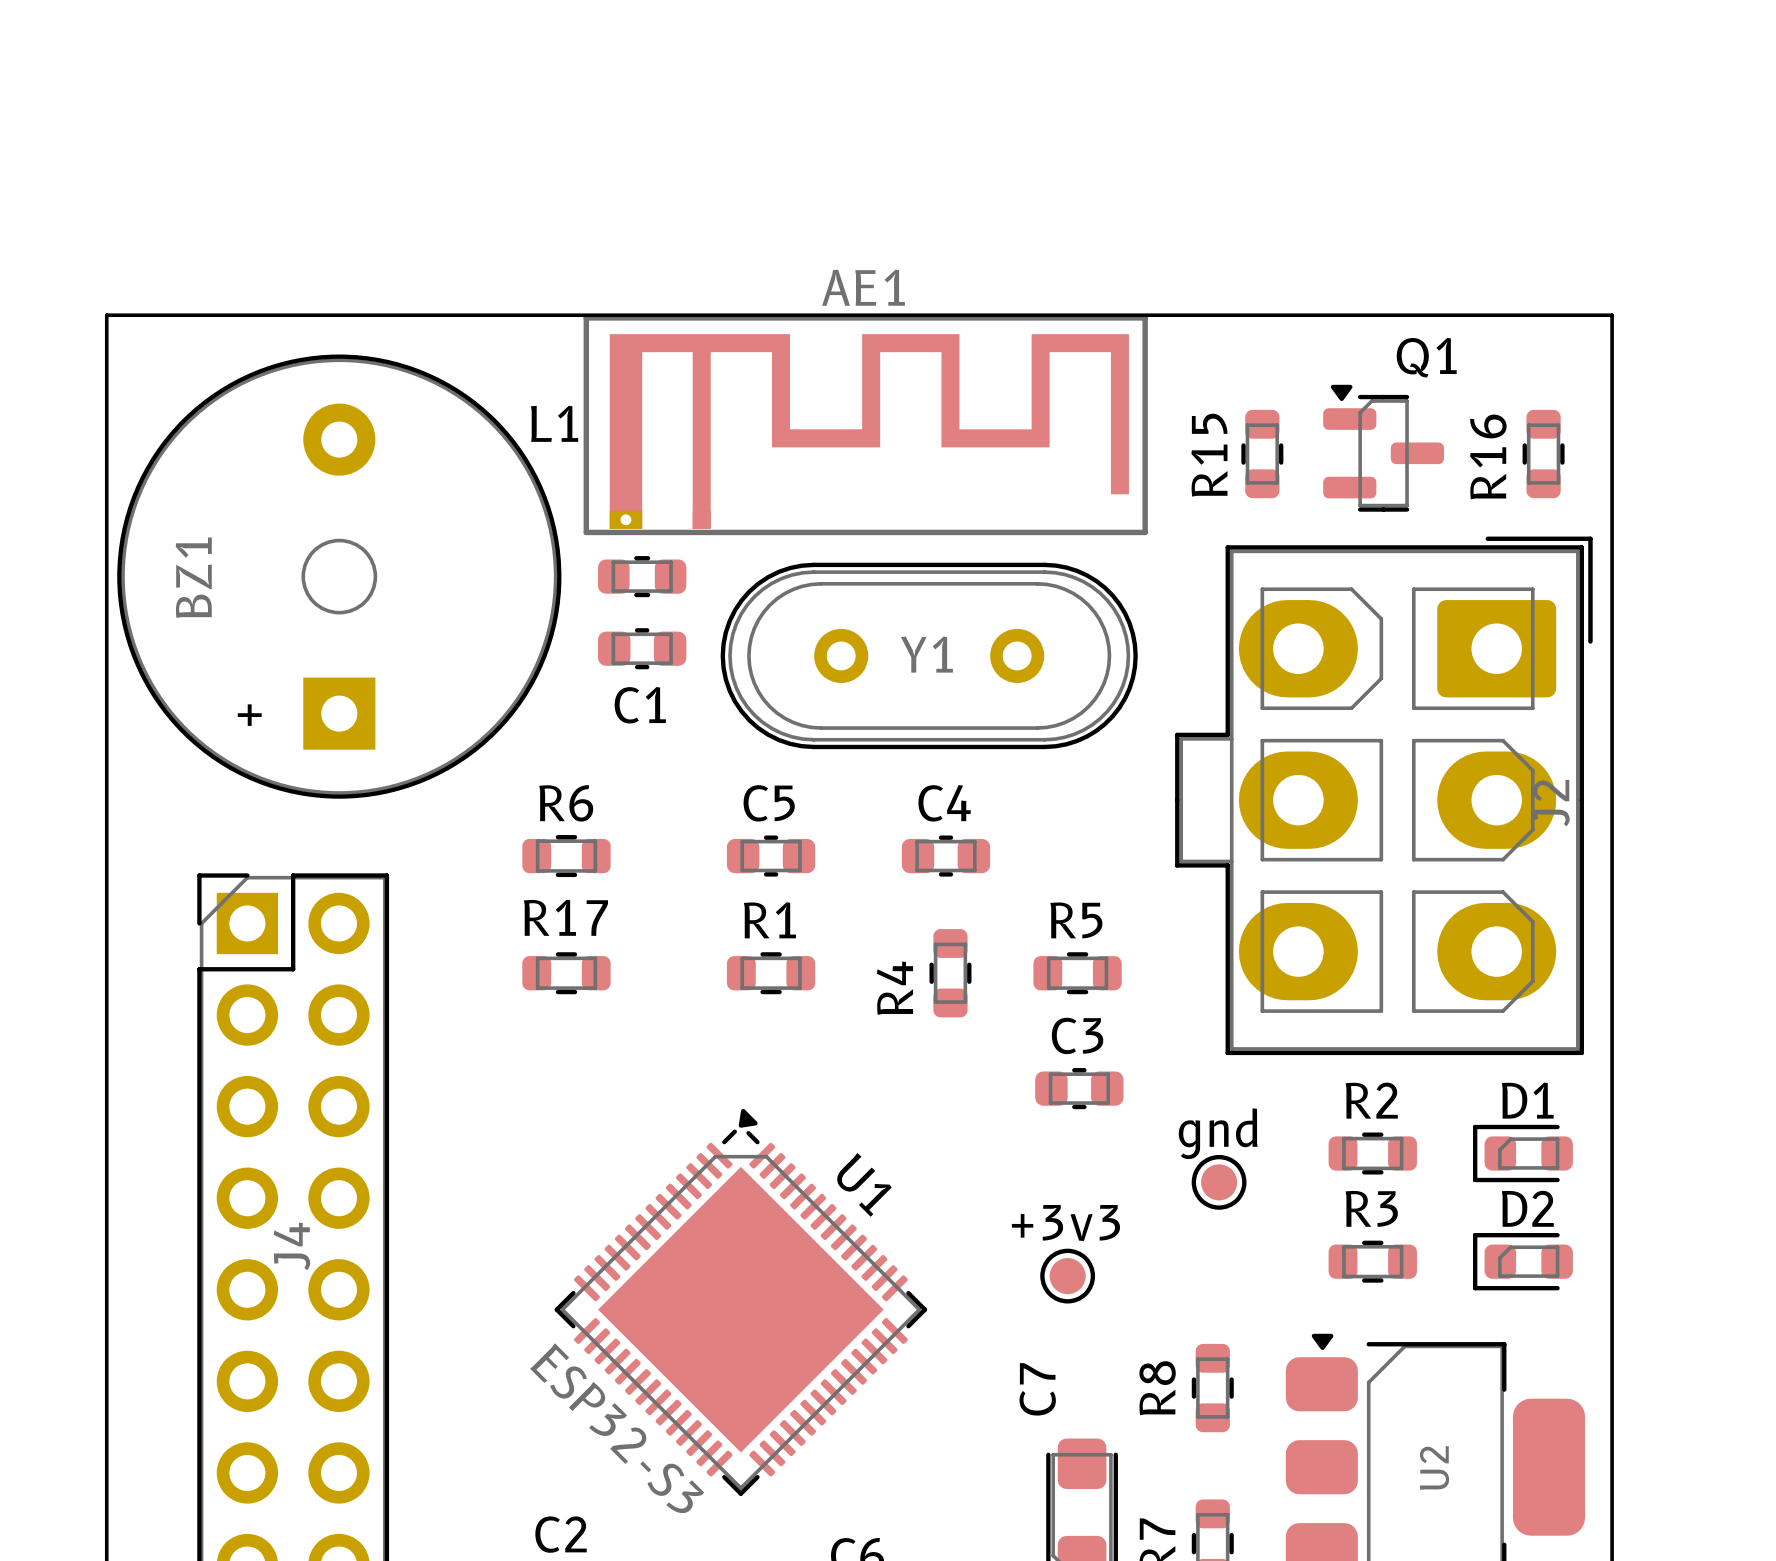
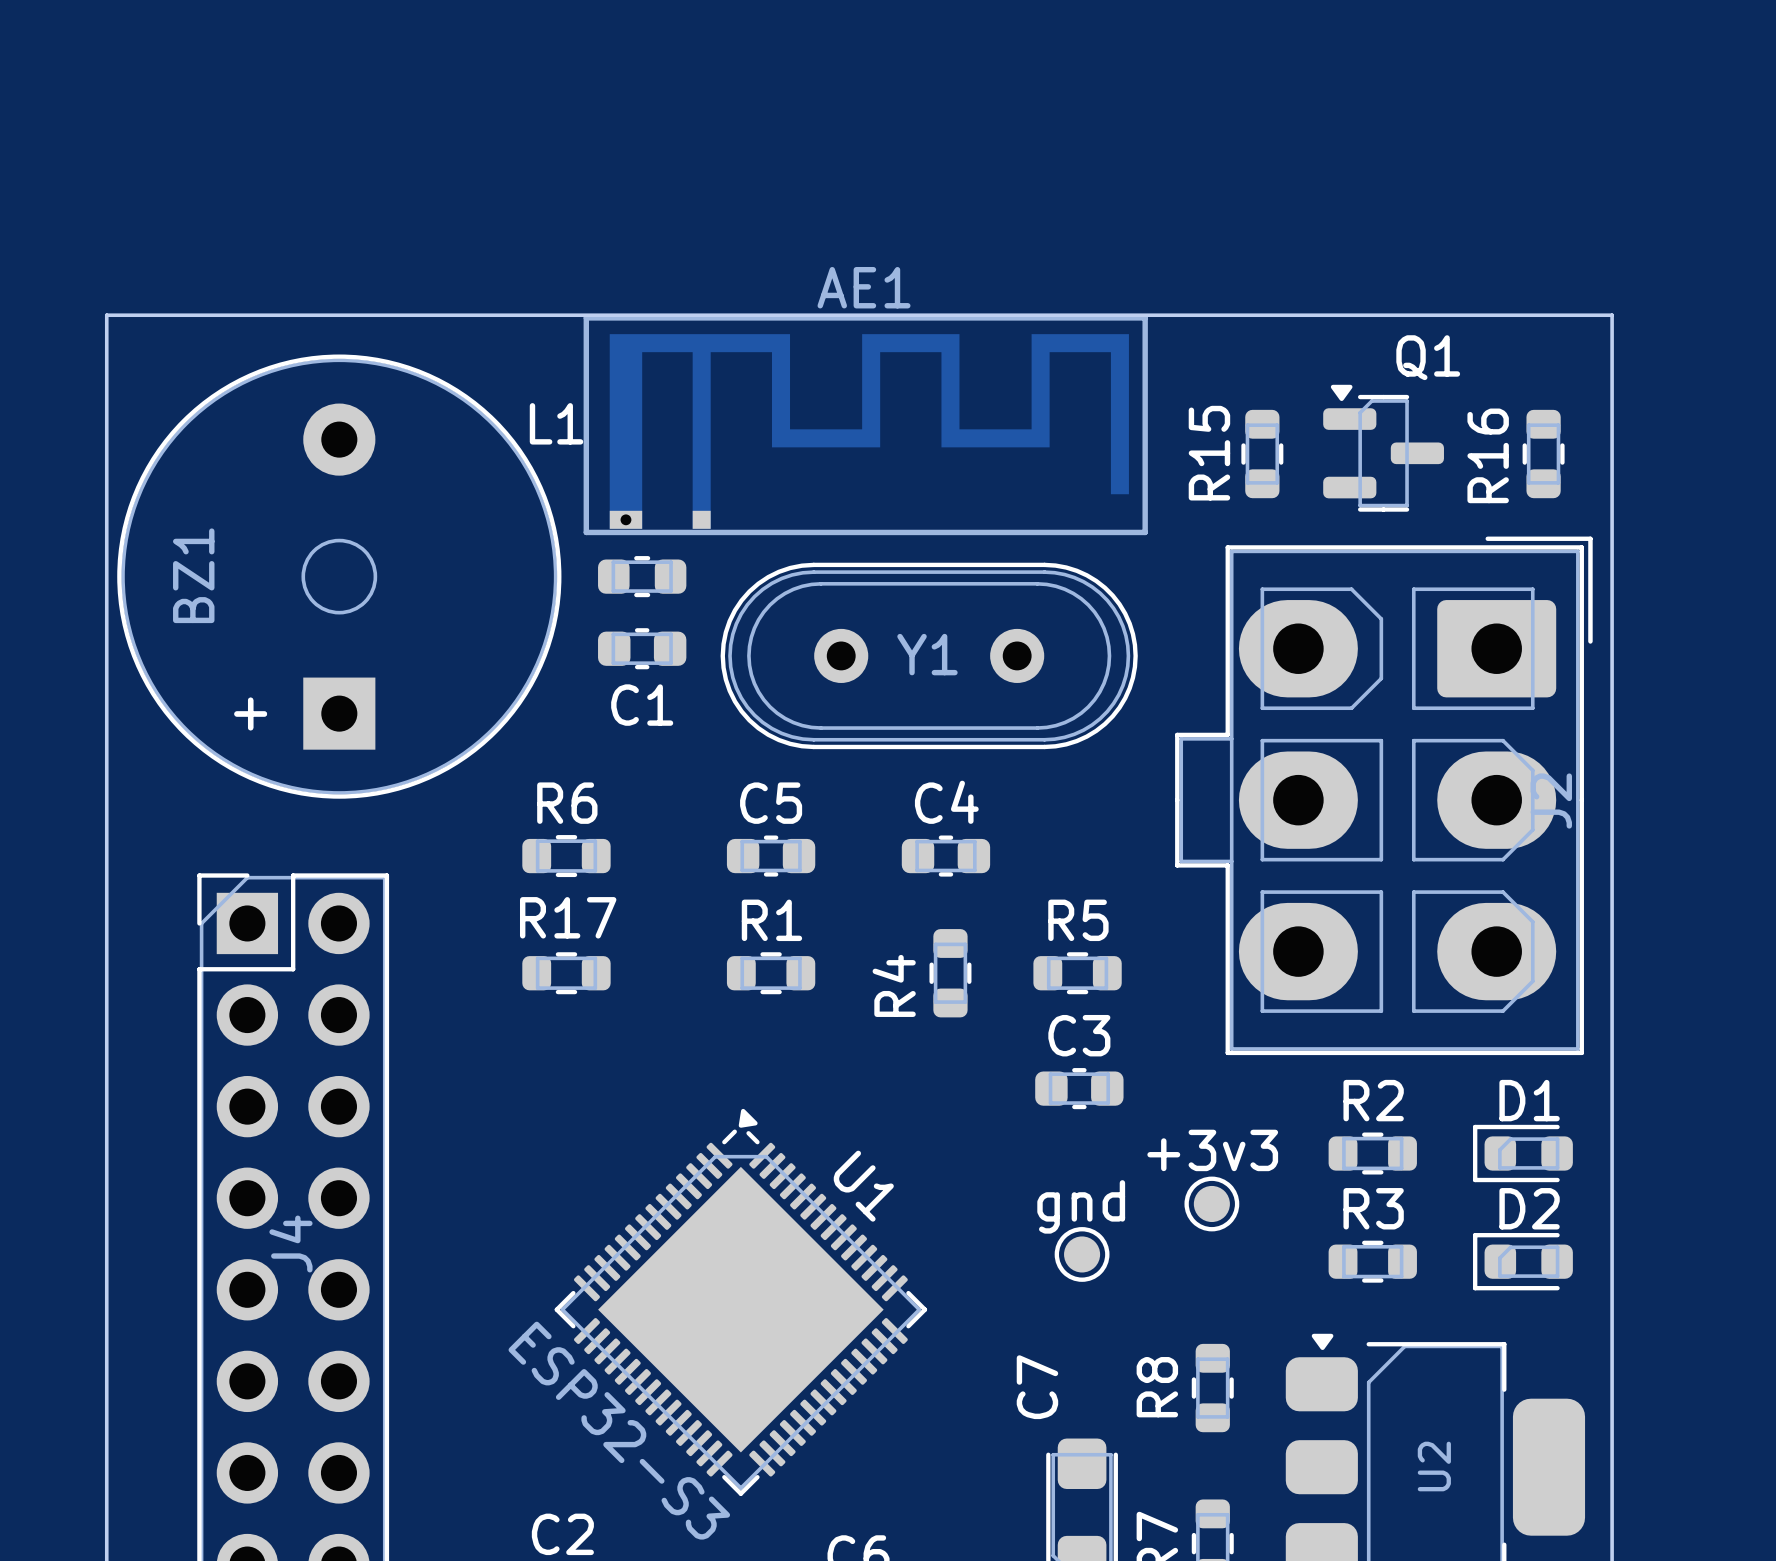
gnd position: (1219, 1182) -> (1082, 1254)
+3v3 position: (1067, 1276) -> (1211, 1203)

